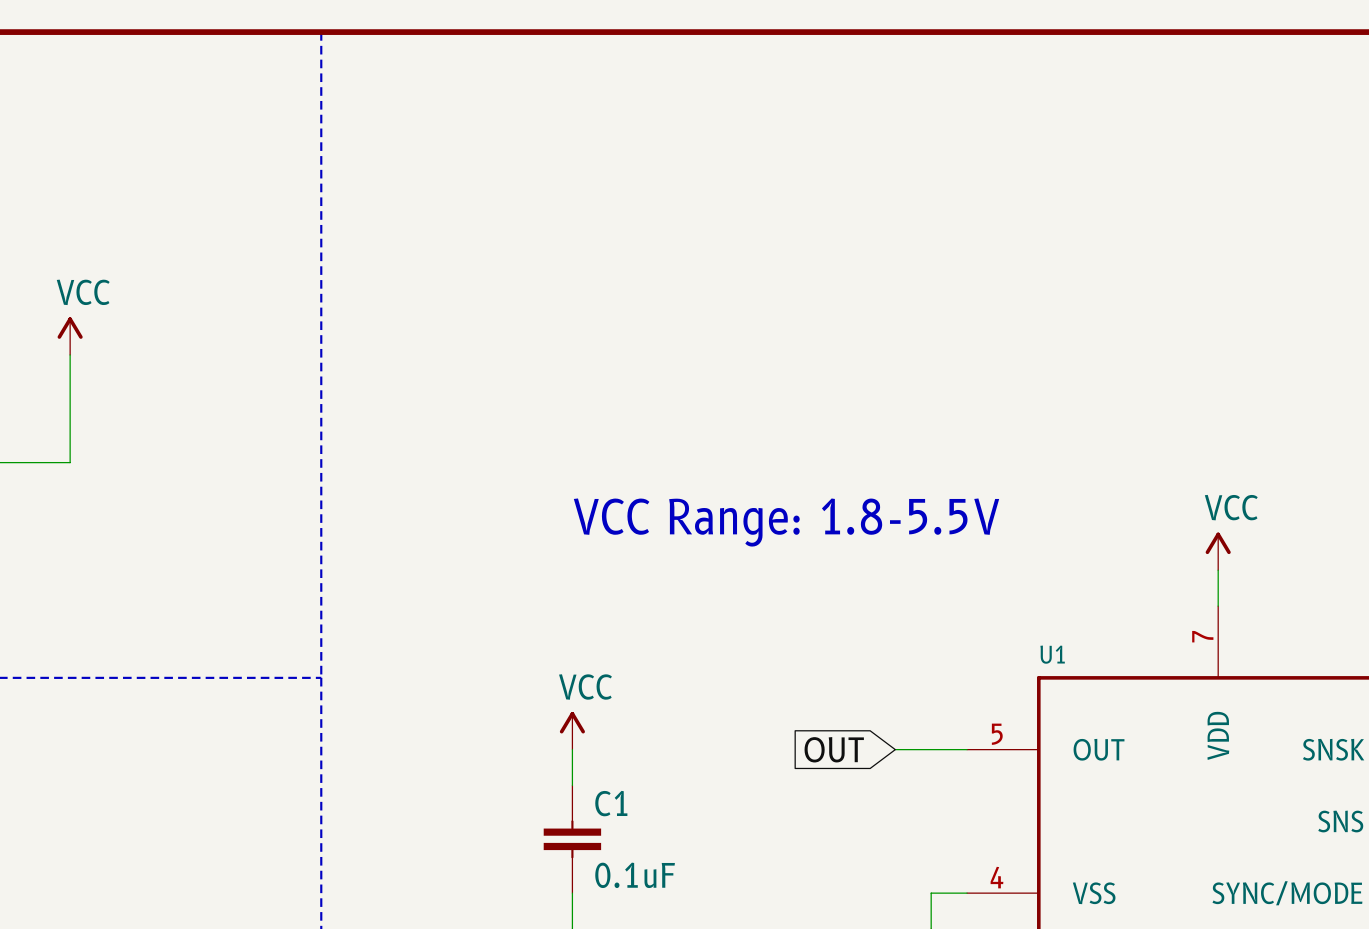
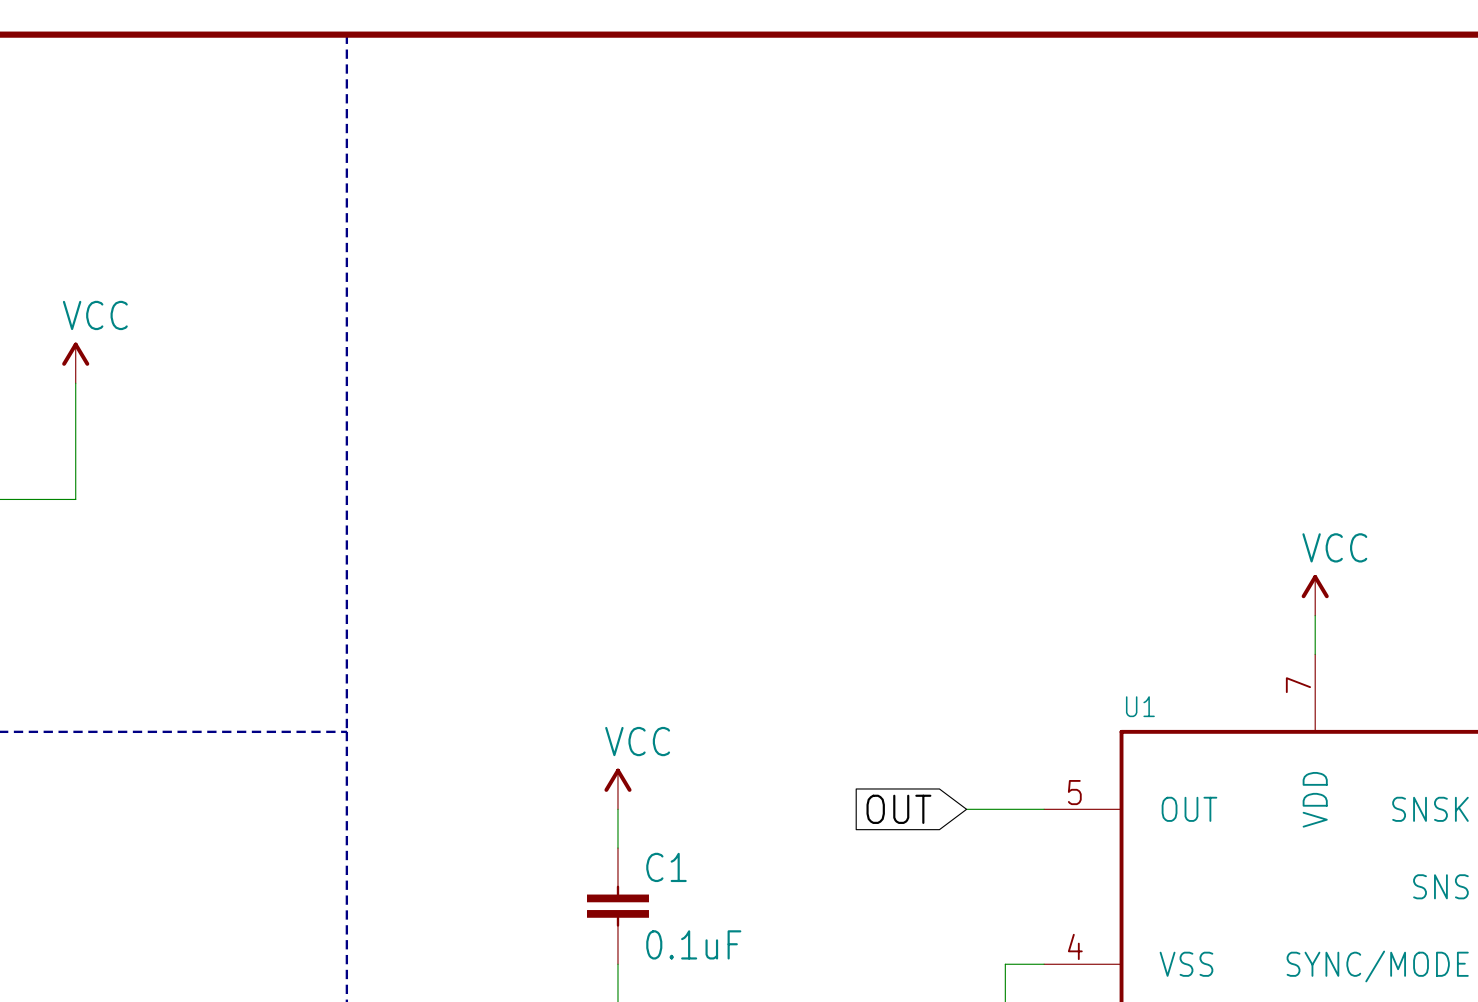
text: VCC Range: 1.8-5.5V (786, 522) -> none

